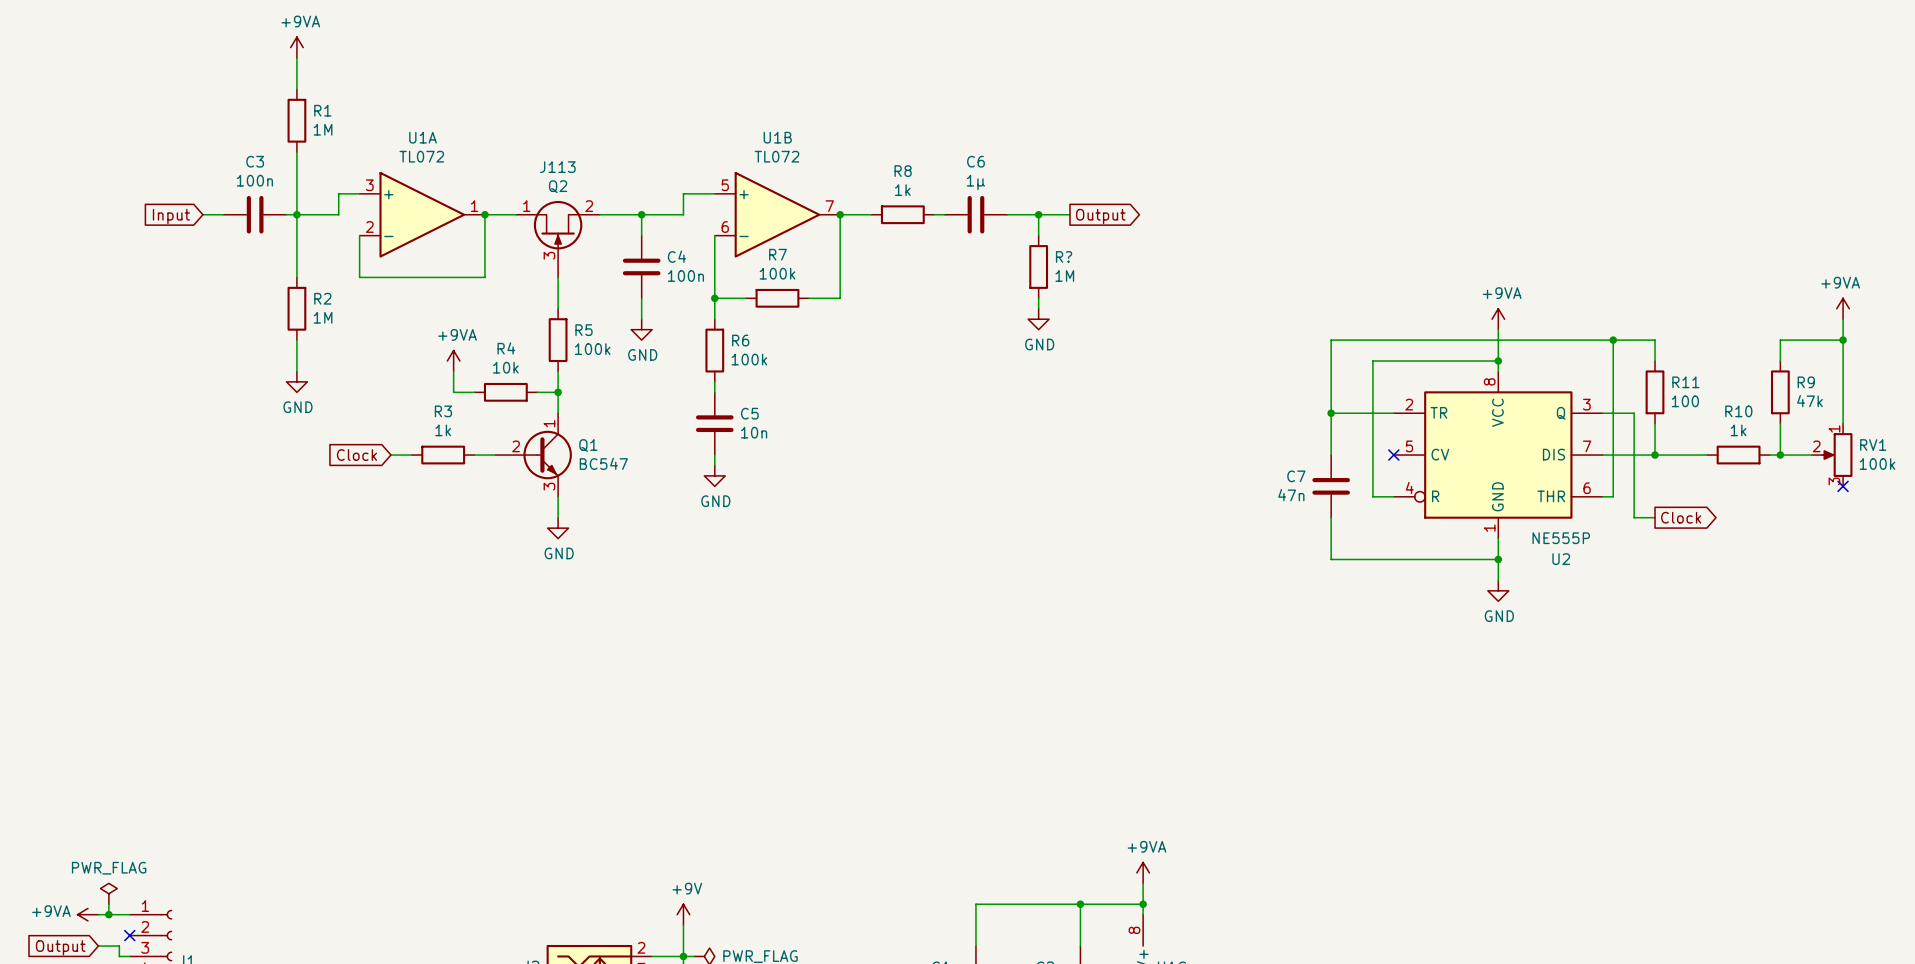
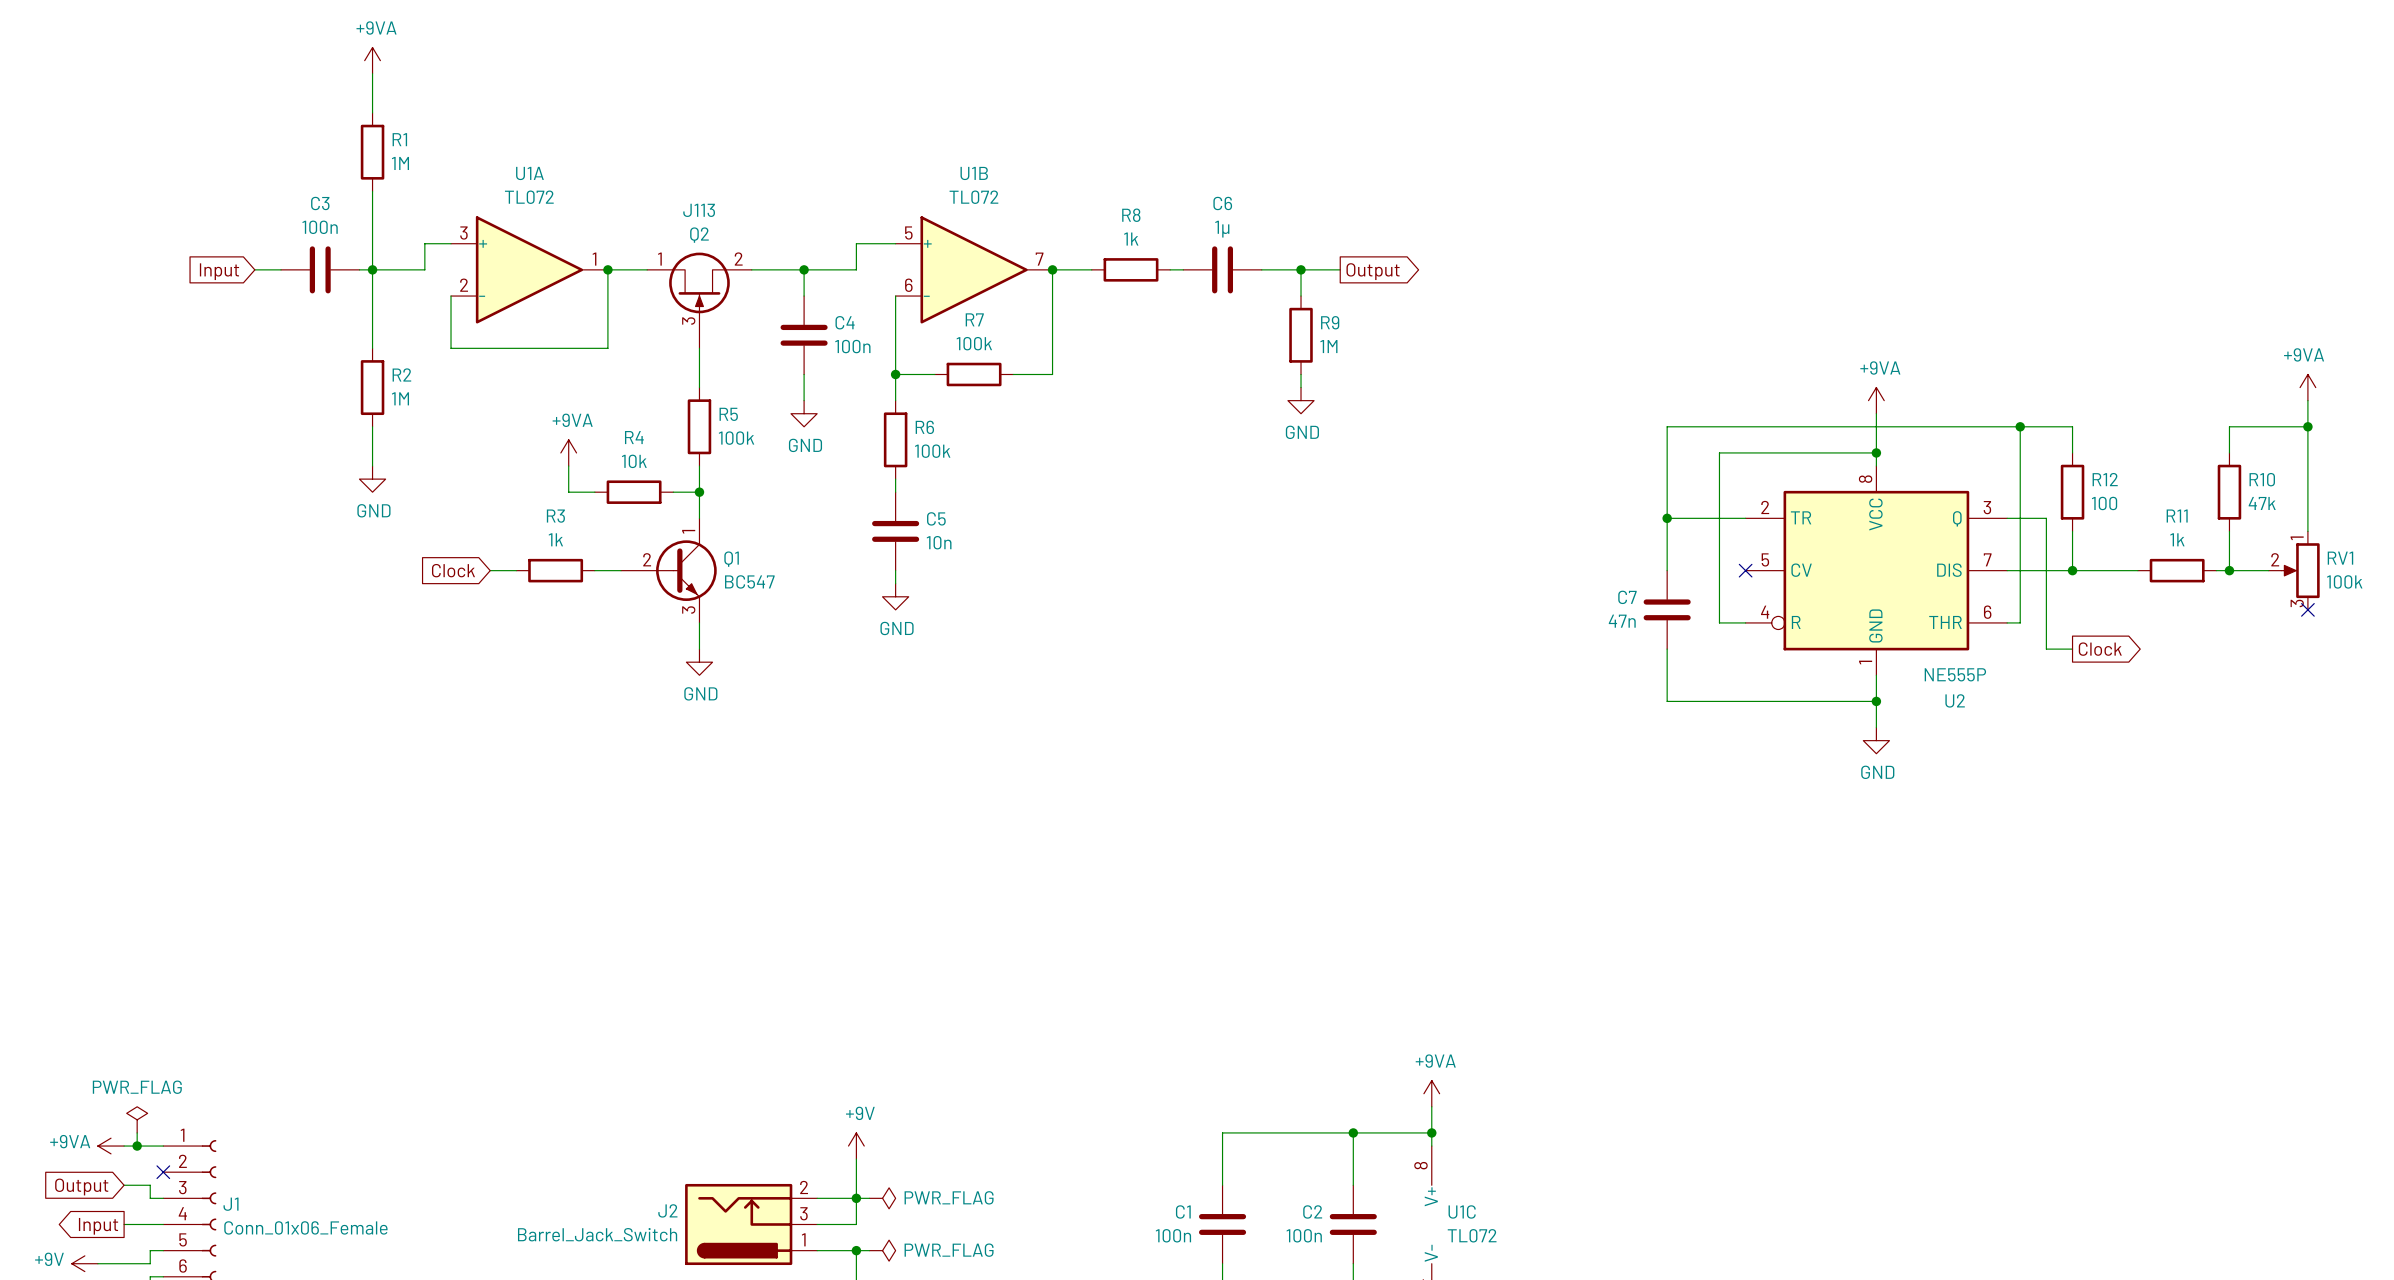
R? name: R? (1064, 256) -> R9 (1330, 322)
R11 name: R11 (1685, 382) -> R12 (2105, 479)
R9 name: R9 (1806, 382) -> R10 (2262, 479)
R10 name: R10 (1738, 411) -> R11 (2177, 516)

